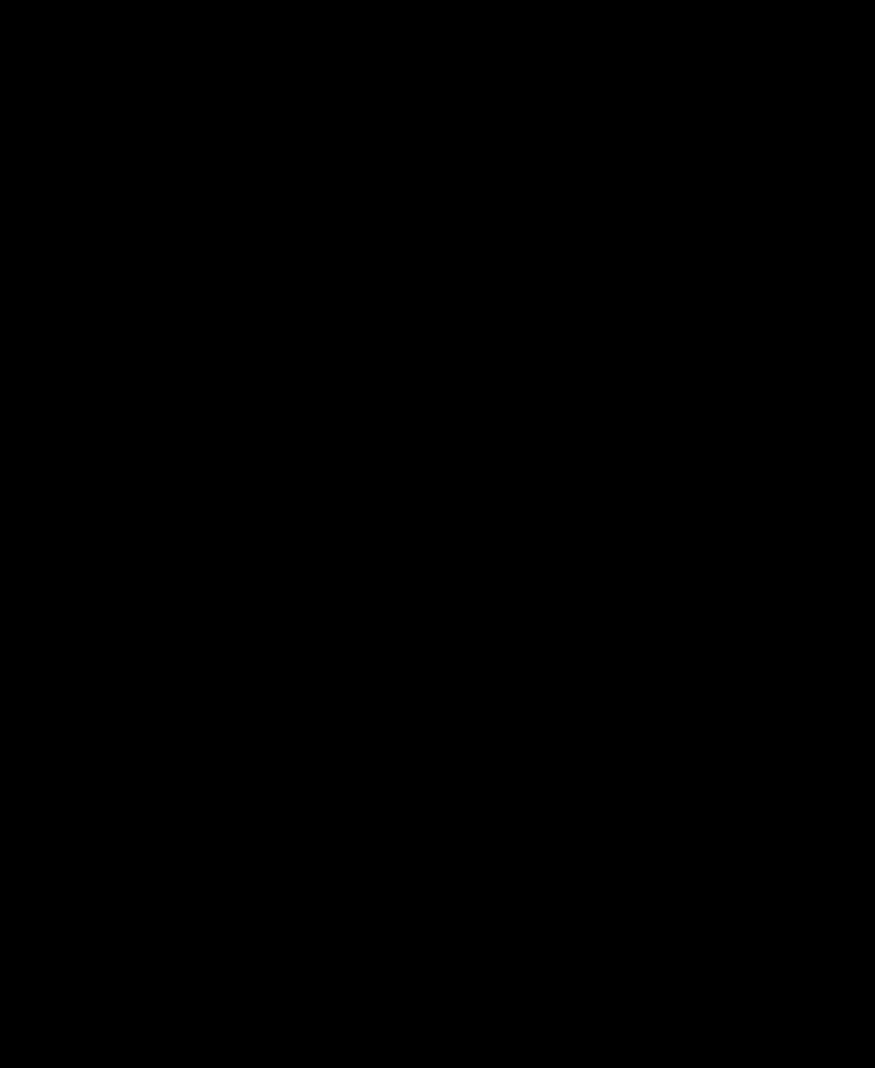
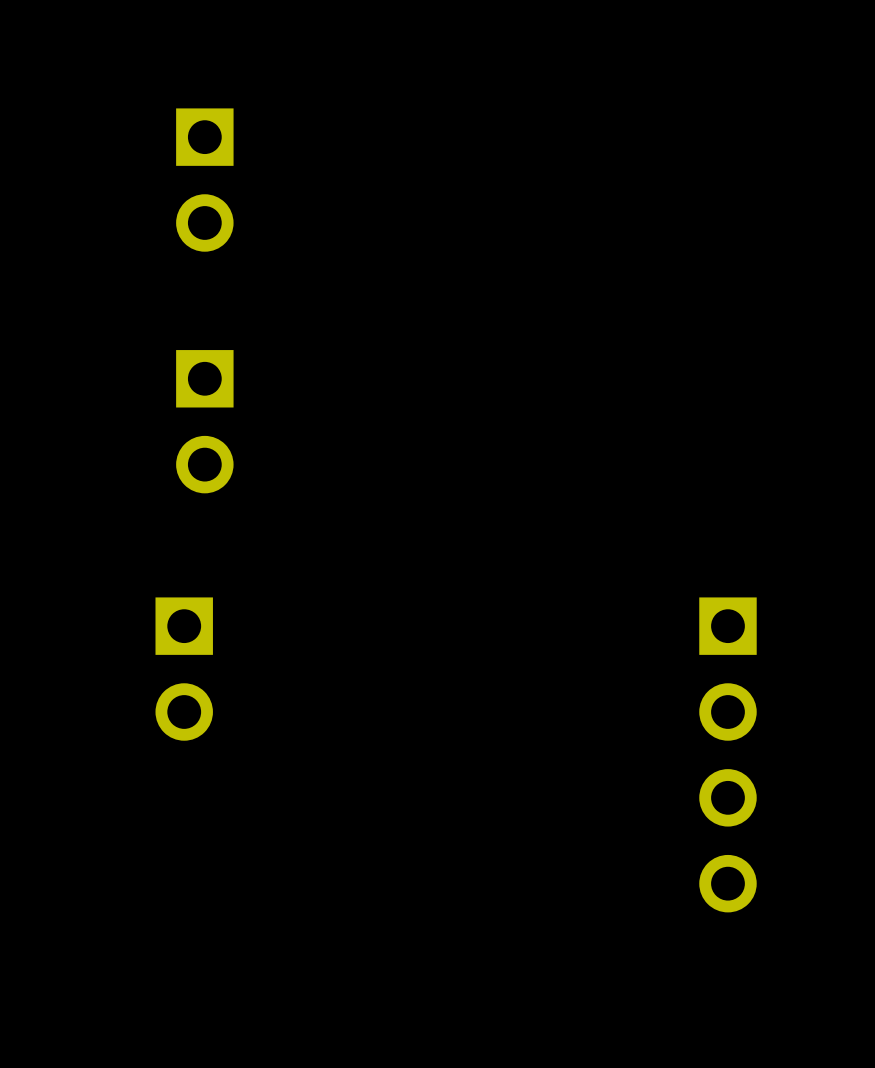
part: none -> (204, 180)
part: none -> (204, 421)
part: none -> (184, 669)
part: none -> (727, 754)

